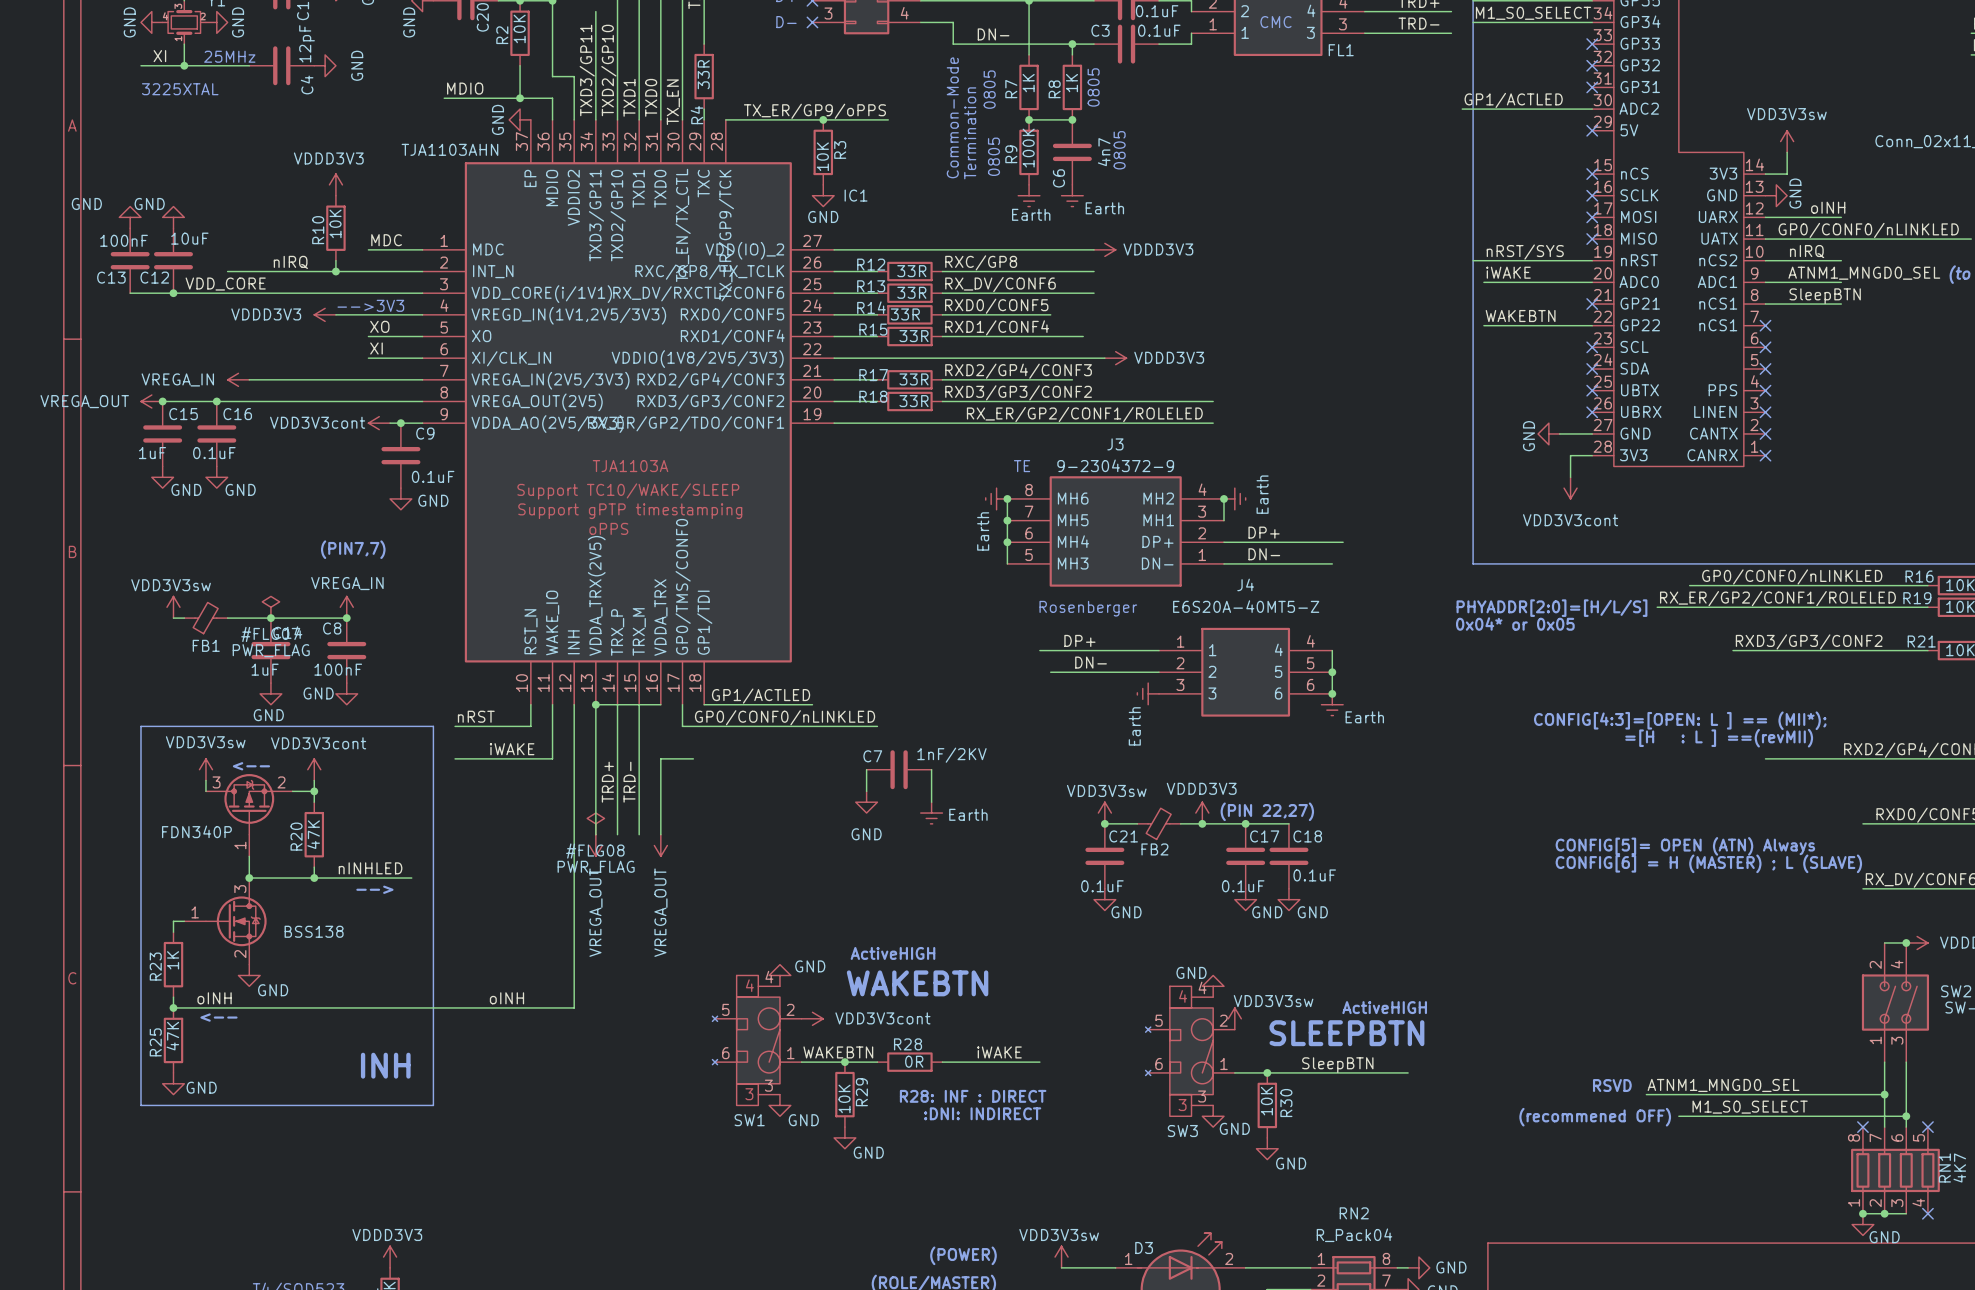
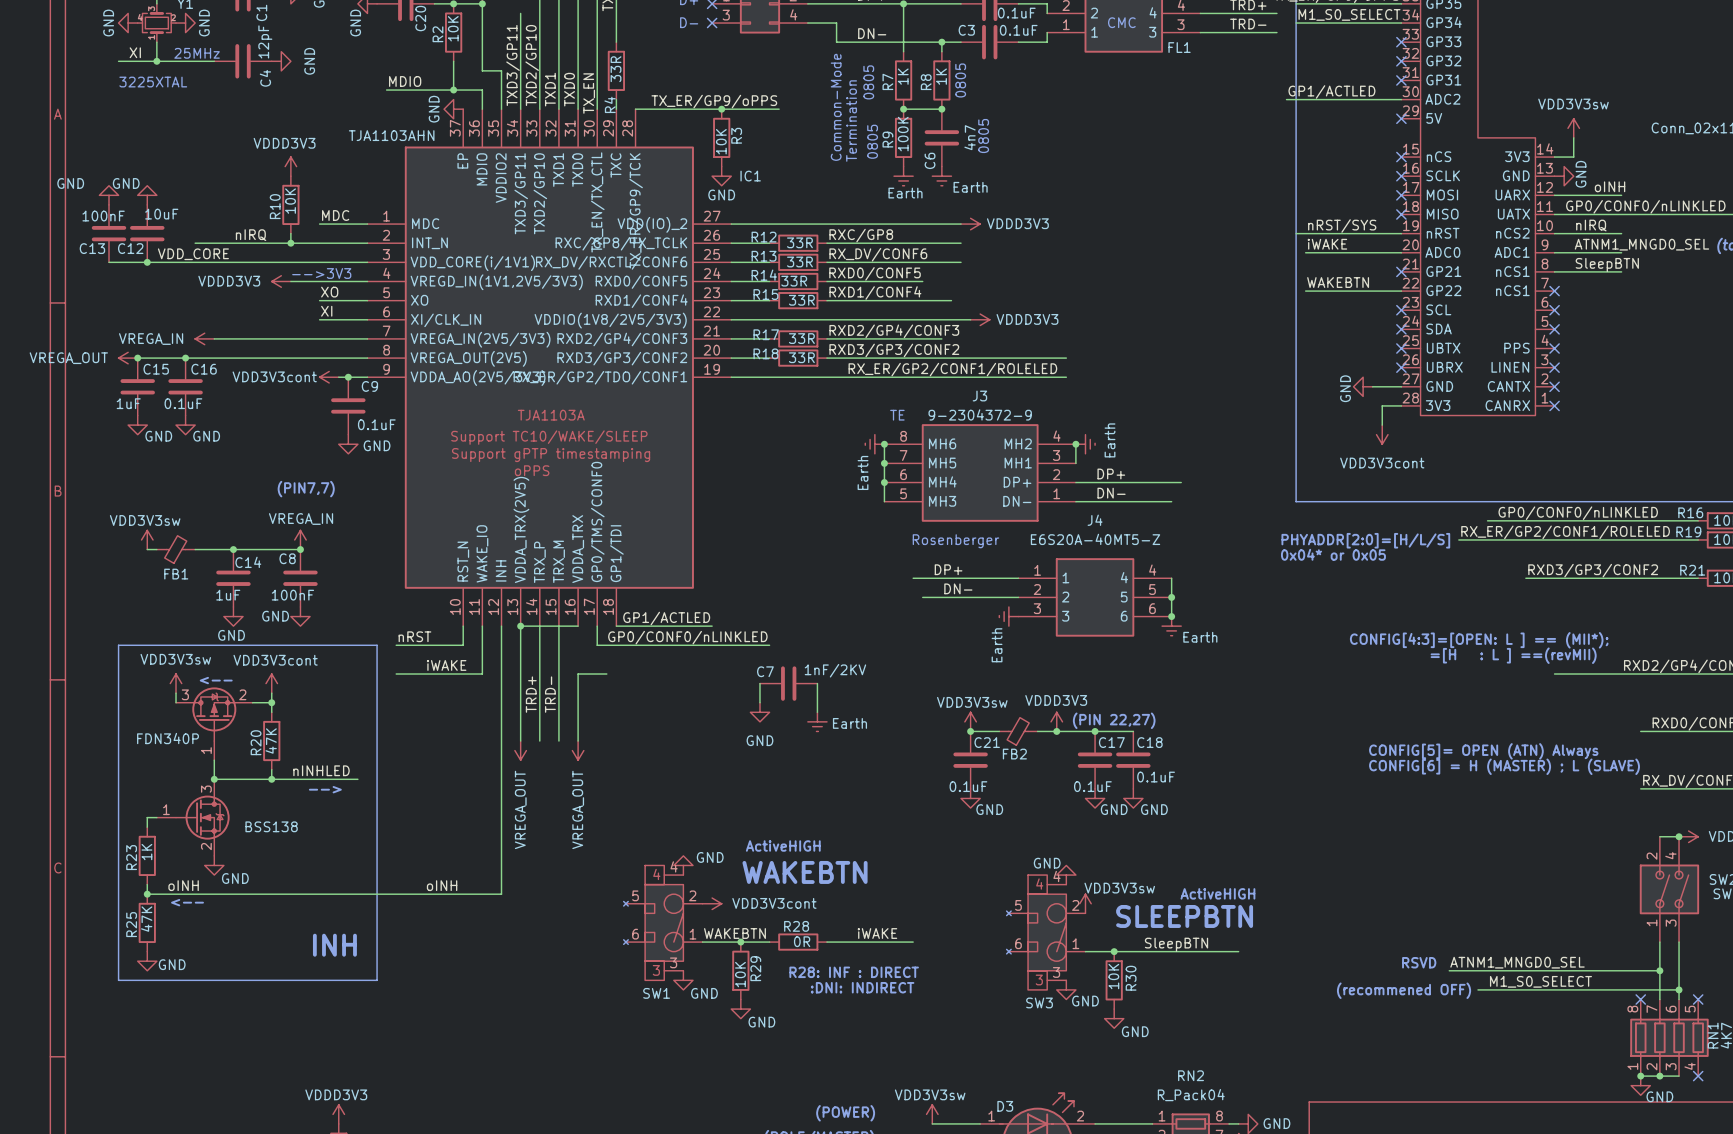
#FLG07: PWR_FLAG (270, 607) -> none
#FLG08: PWR_FLAG (595, 823) -> none

